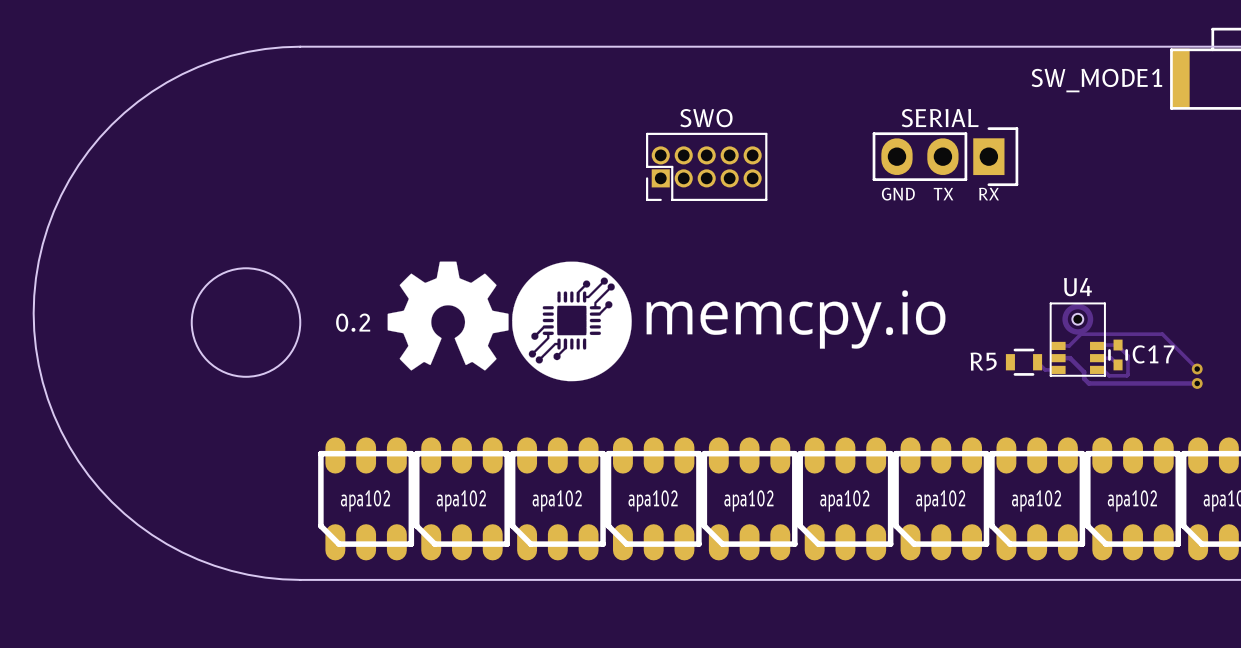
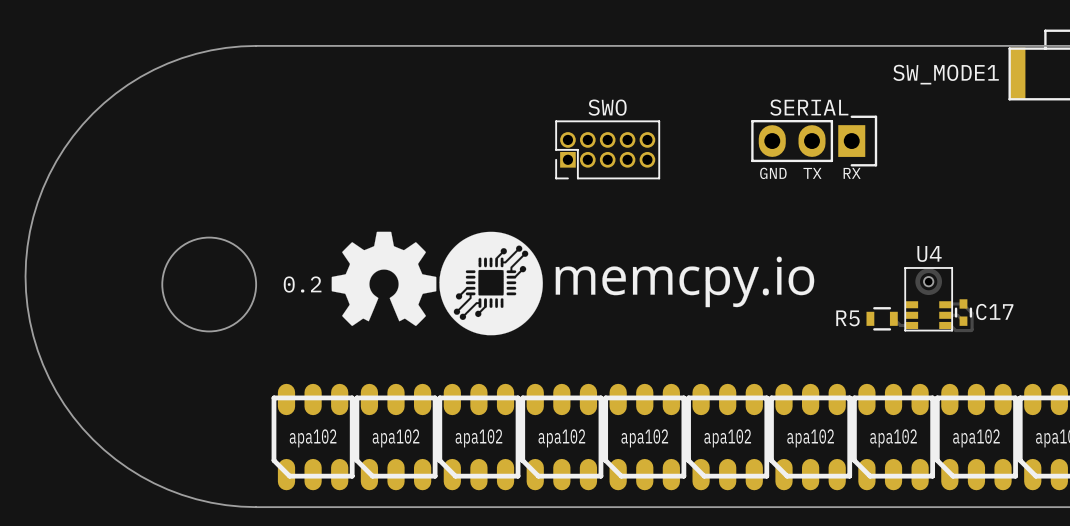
track: (1058, 345) (1069, 345) (1080, 334) (1162, 334) (1197, 369) -> none
track: (1058, 358) (1070, 358) (1084, 372) (1084, 378) (1088, 383) (1197, 383) -> none
via: (1197, 369) -> none
via: (1197, 383) -> none

